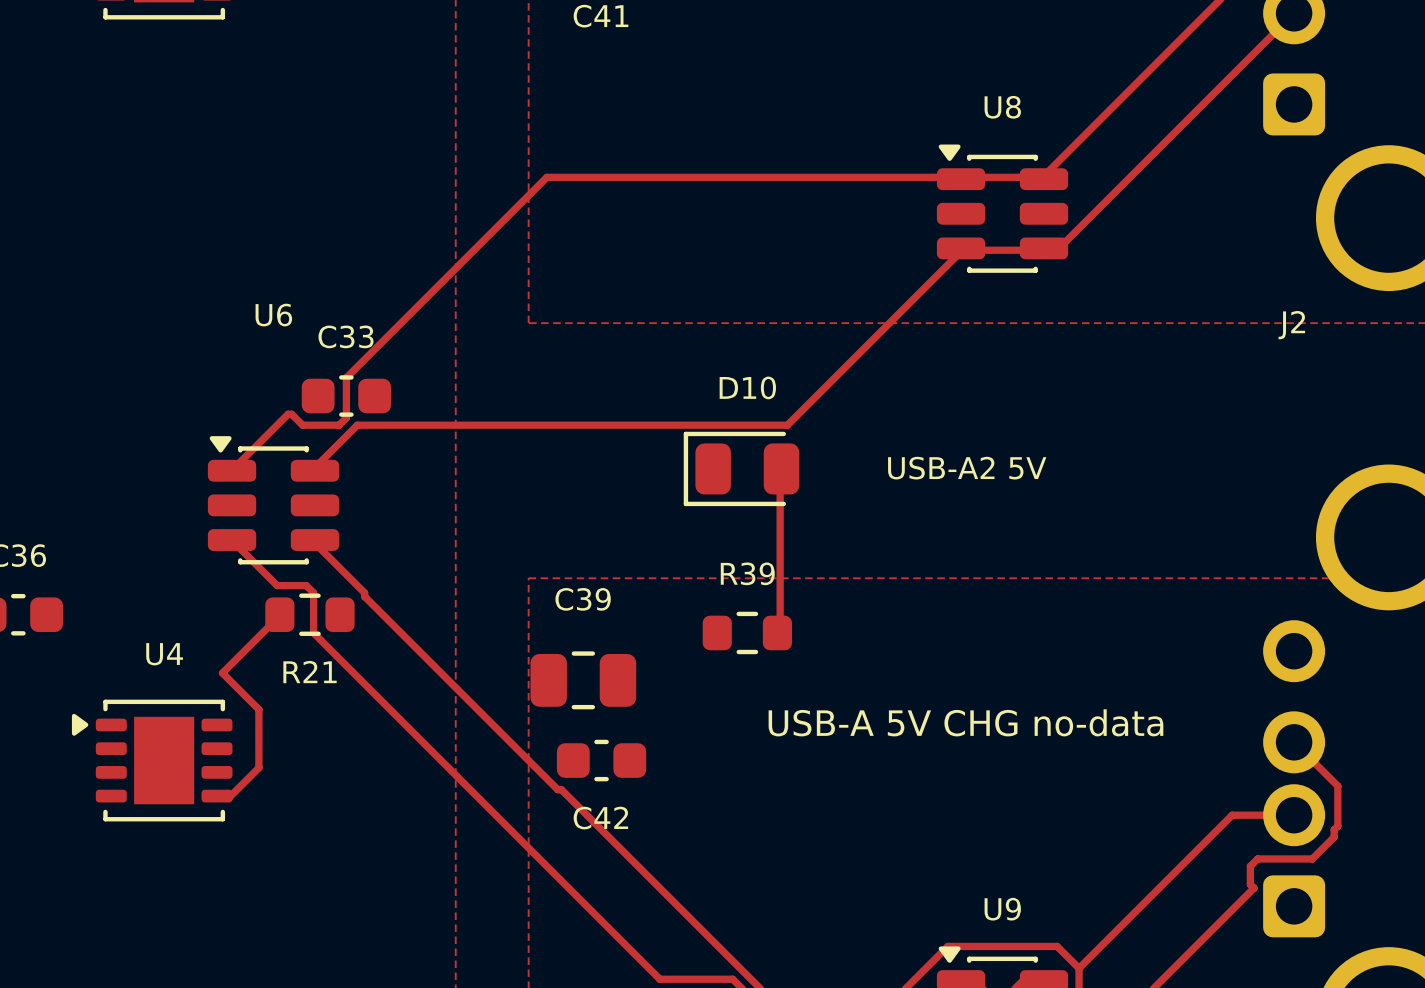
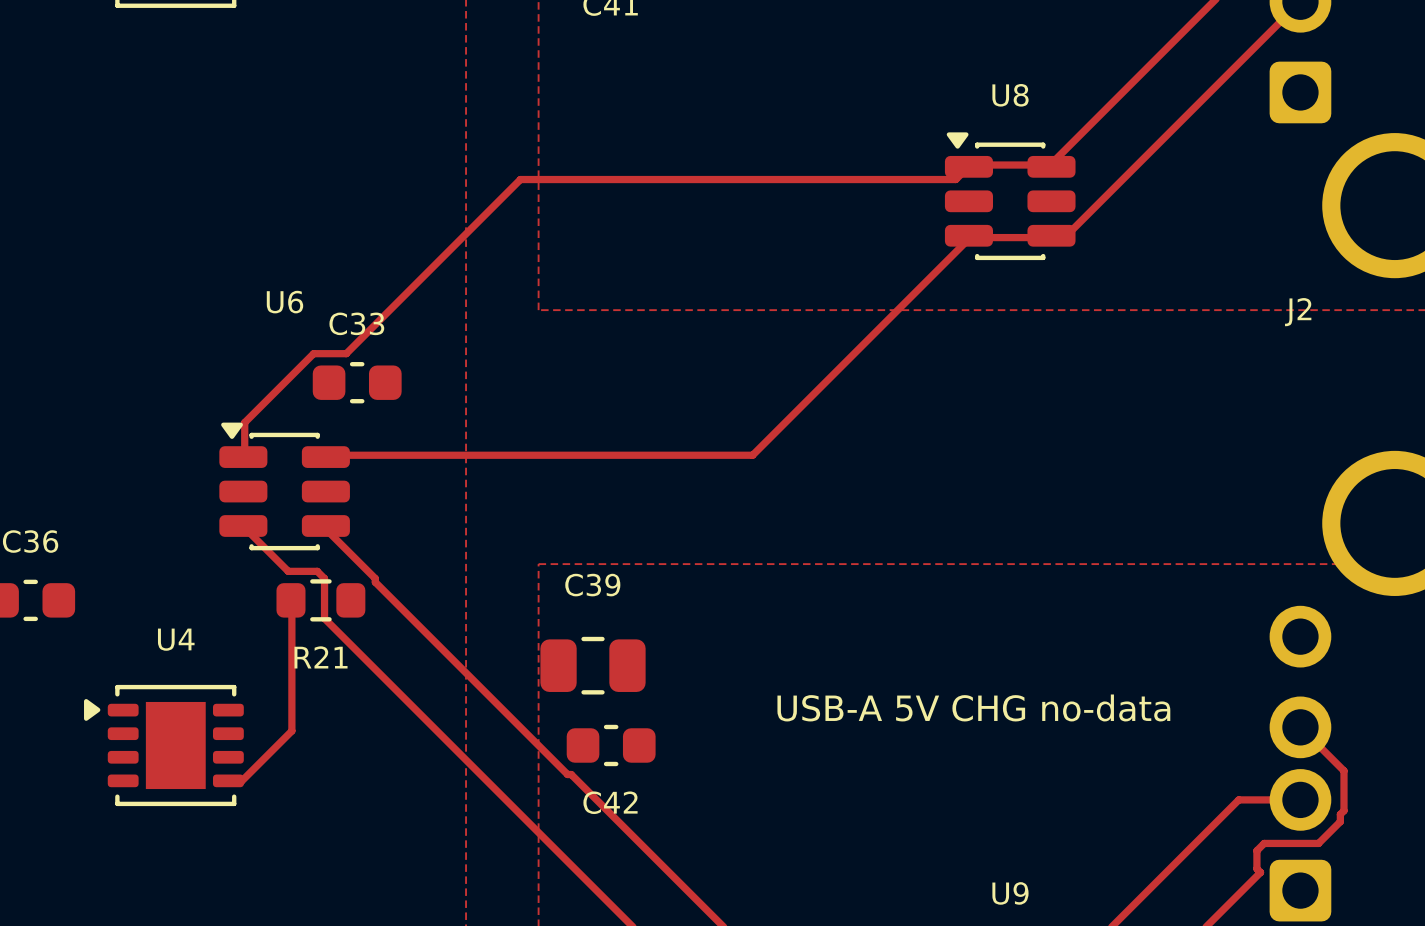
track: (962, 177) (546, 177) (346, 377) (346, 417) (339, 425) (302, 425) (291, 414) (288, 414) (233, 468) -> (970, 165) (955, 179) (520, 179) (346, 353) (313, 353) (244, 422) (244, 455)
track: (787, 425) (357, 425) (313, 468) -> (796, 411) (752, 455) (324, 455)
D10: (741, 468) -> none
track: (781, 468) (780, 629) (777, 632) -> none
text: USB-A2 5V (967, 468) -> none
track: (280, 614) (222, 673) (258, 709) (258, 767) -> (291, 600) (291, 730) (270, 752)
R39: (747, 632) -> none

